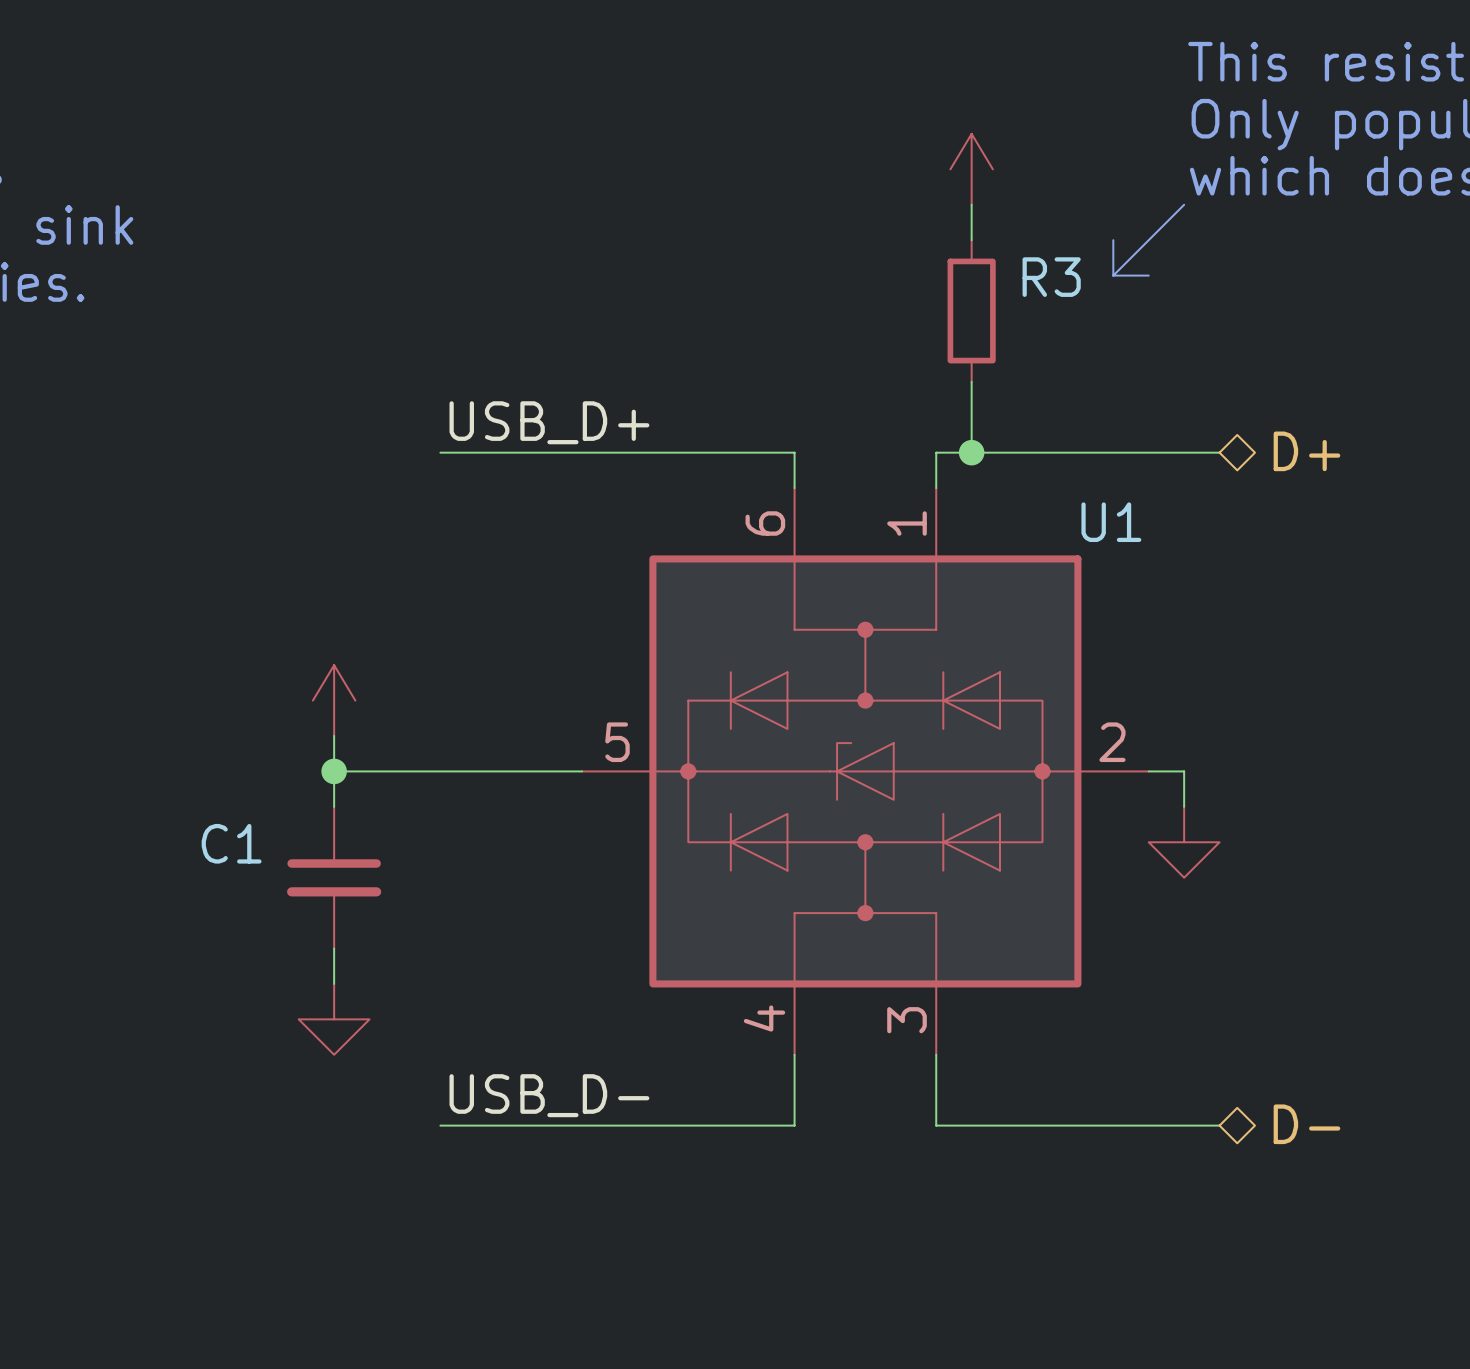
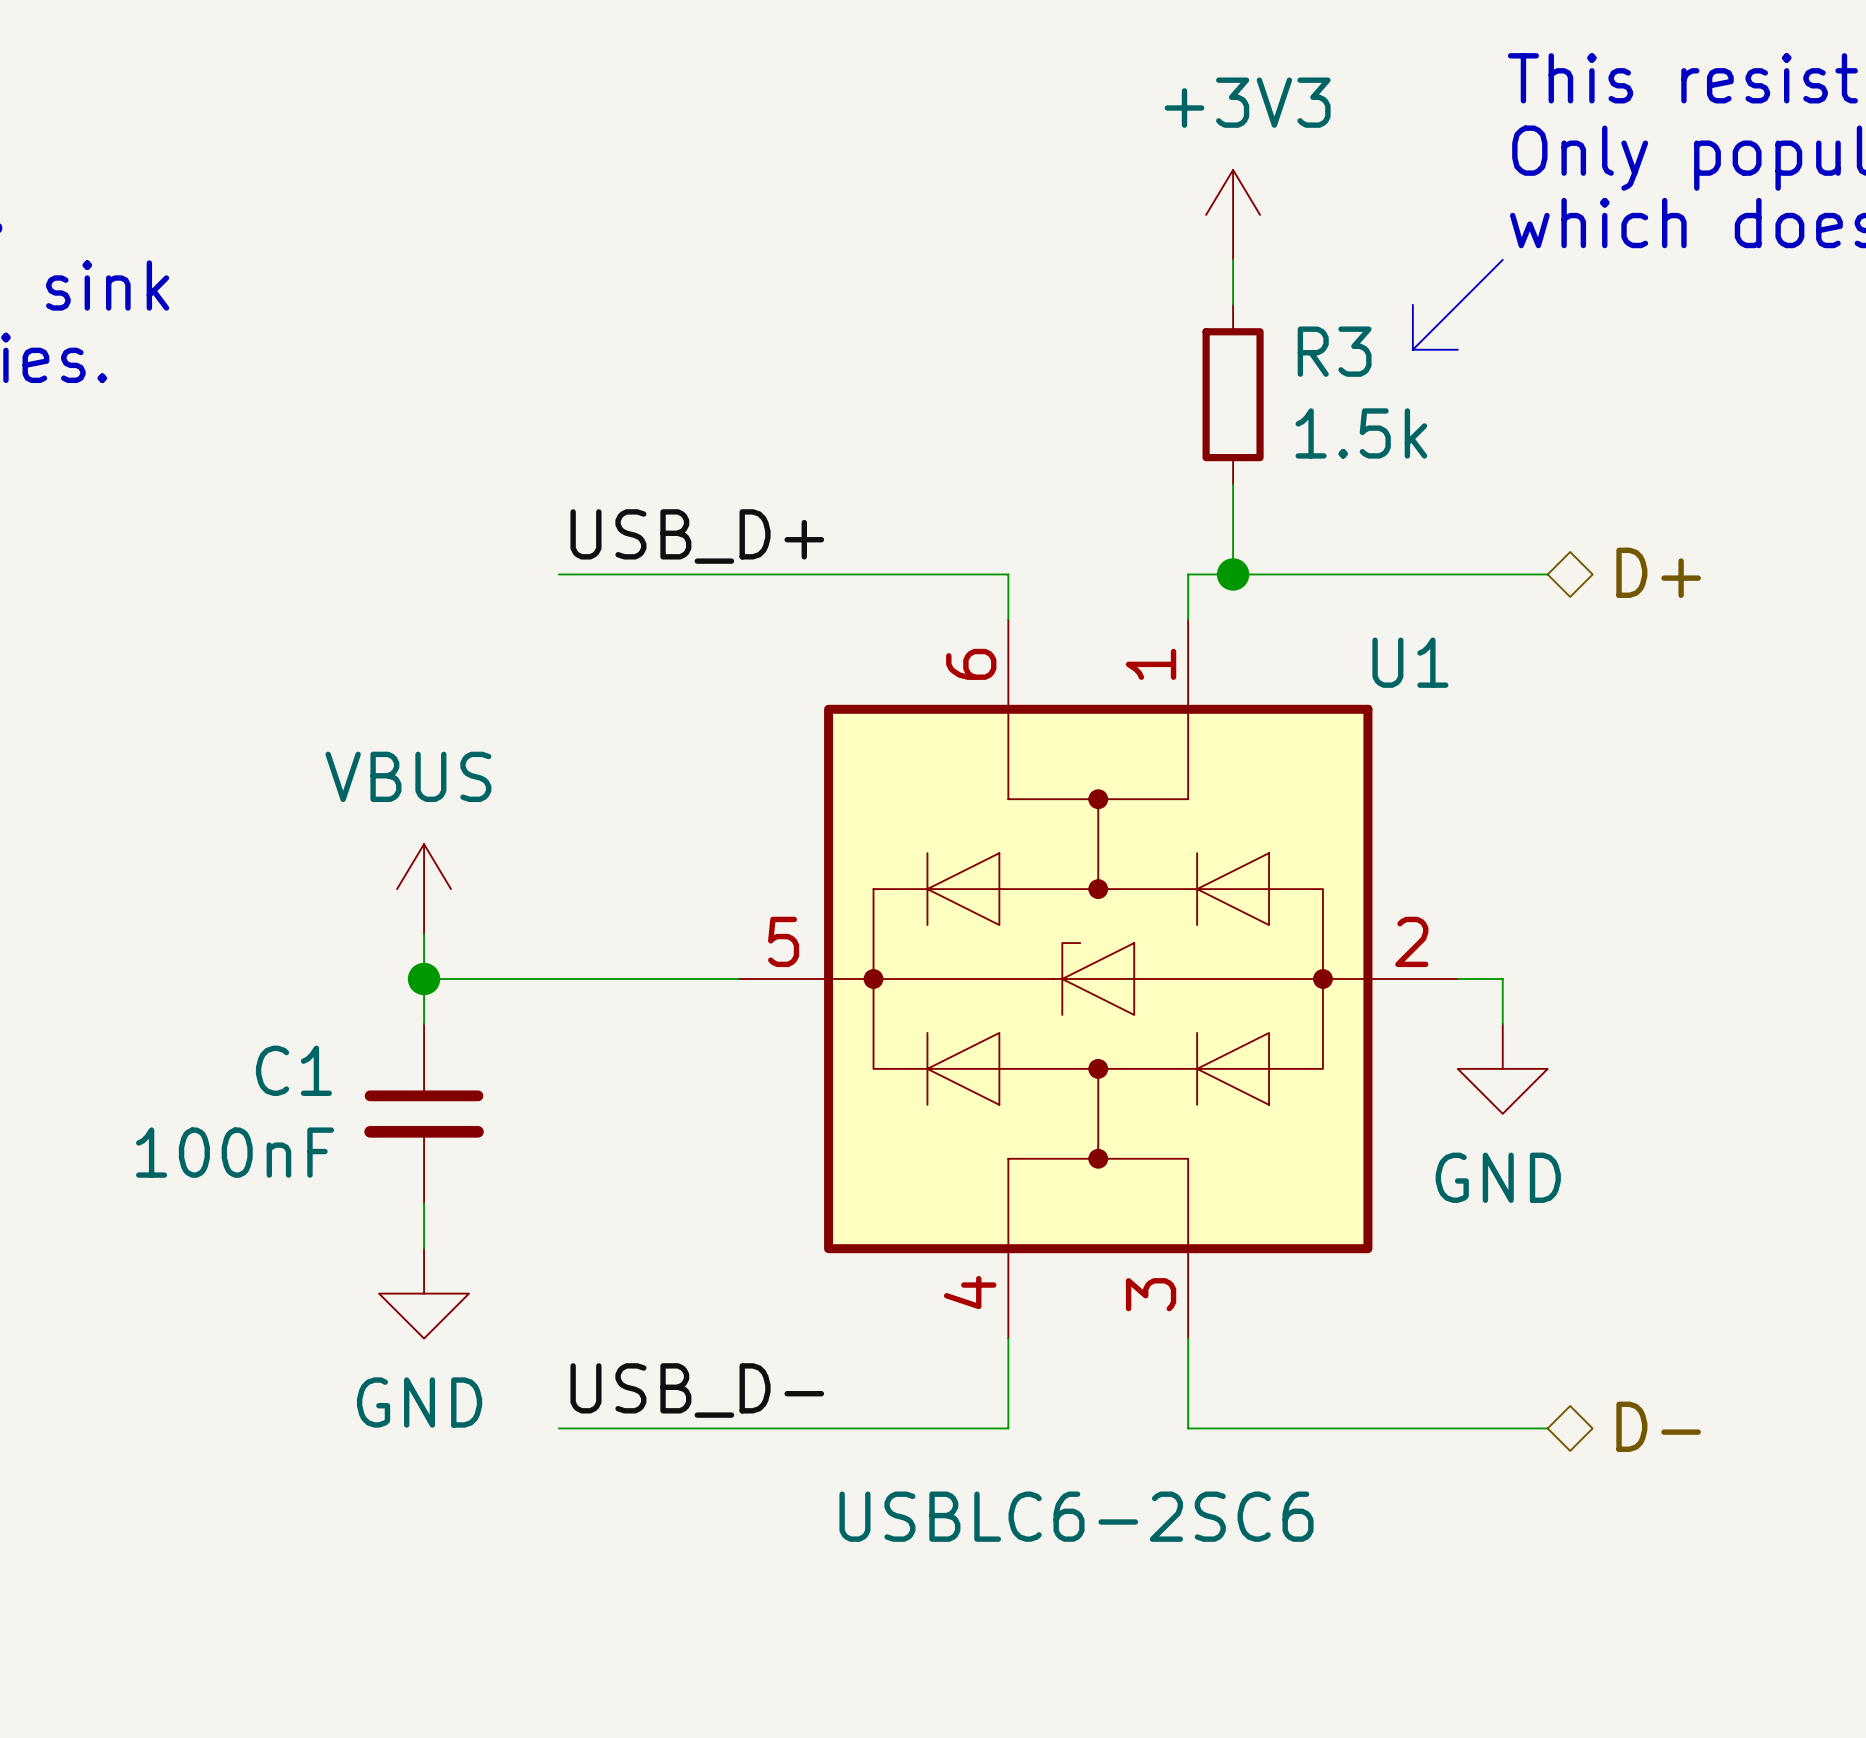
power symbol text: none -> +3V3 (1247, 102)
R3 value: none -> 1.5k (1361, 433)
power symbol text: none -> VBUS (408, 776)
C1 value: none -> 100nF (235, 1152)
power symbol text: none -> GND (1498, 1177)
power symbol text: none -> GND (419, 1402)
U1 value: none -> USBLC6-2SC6 (1076, 1516)

